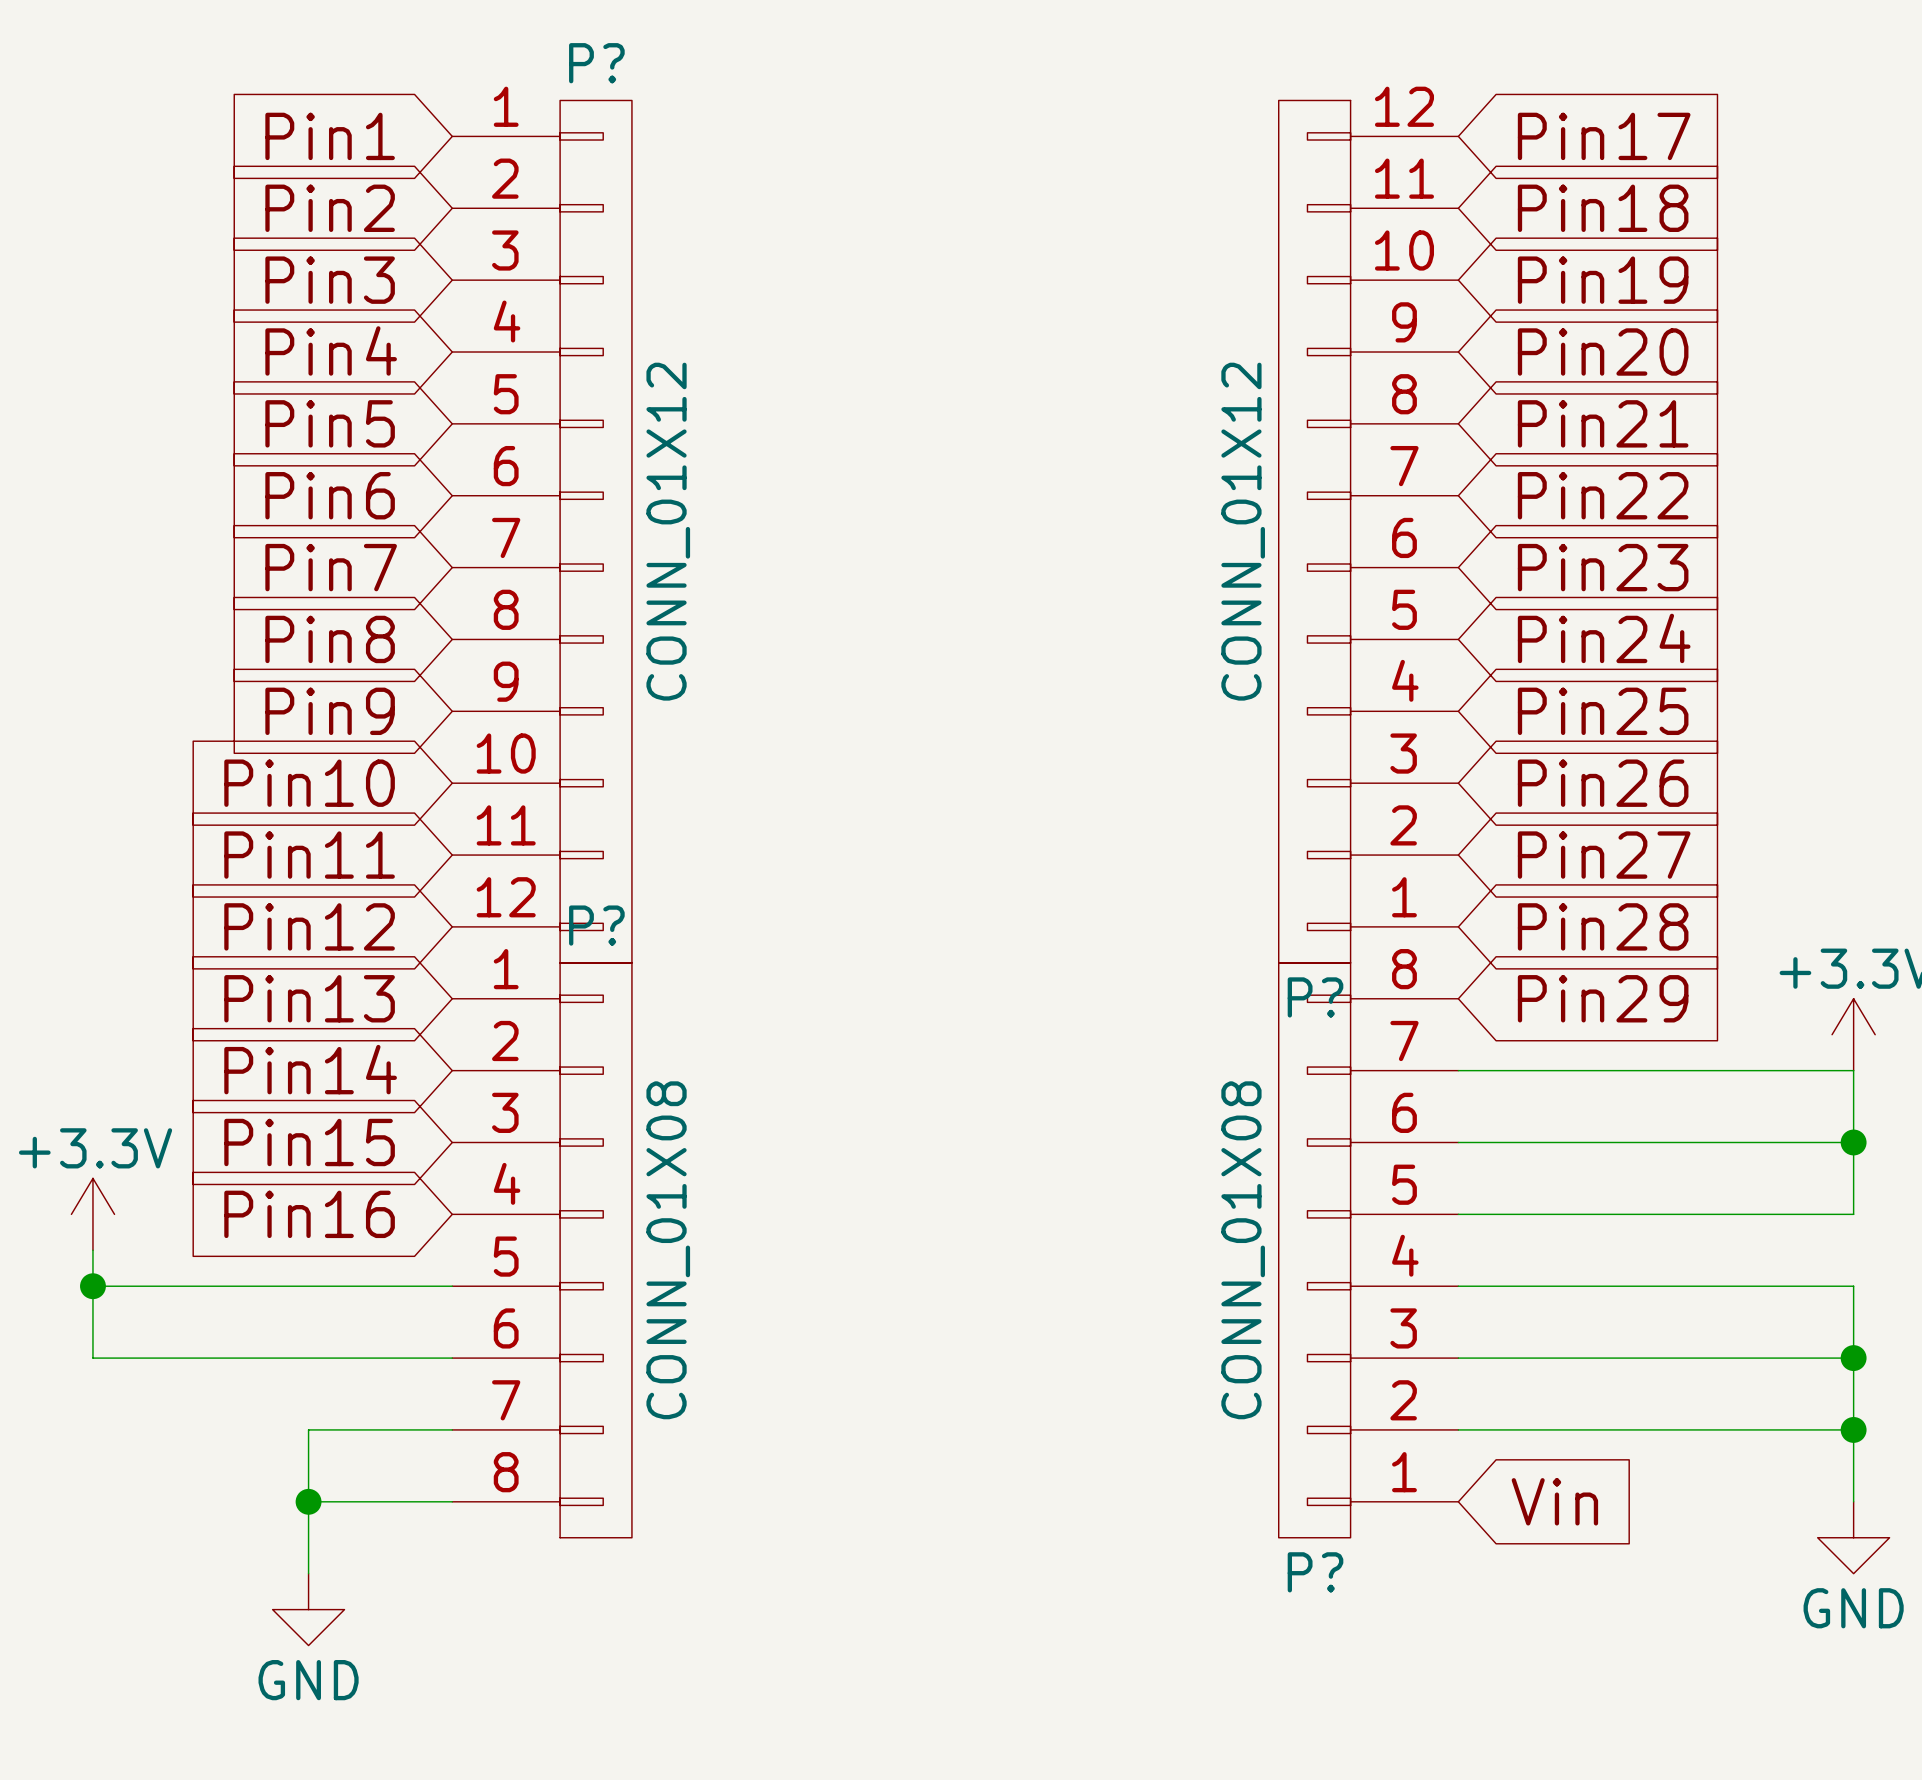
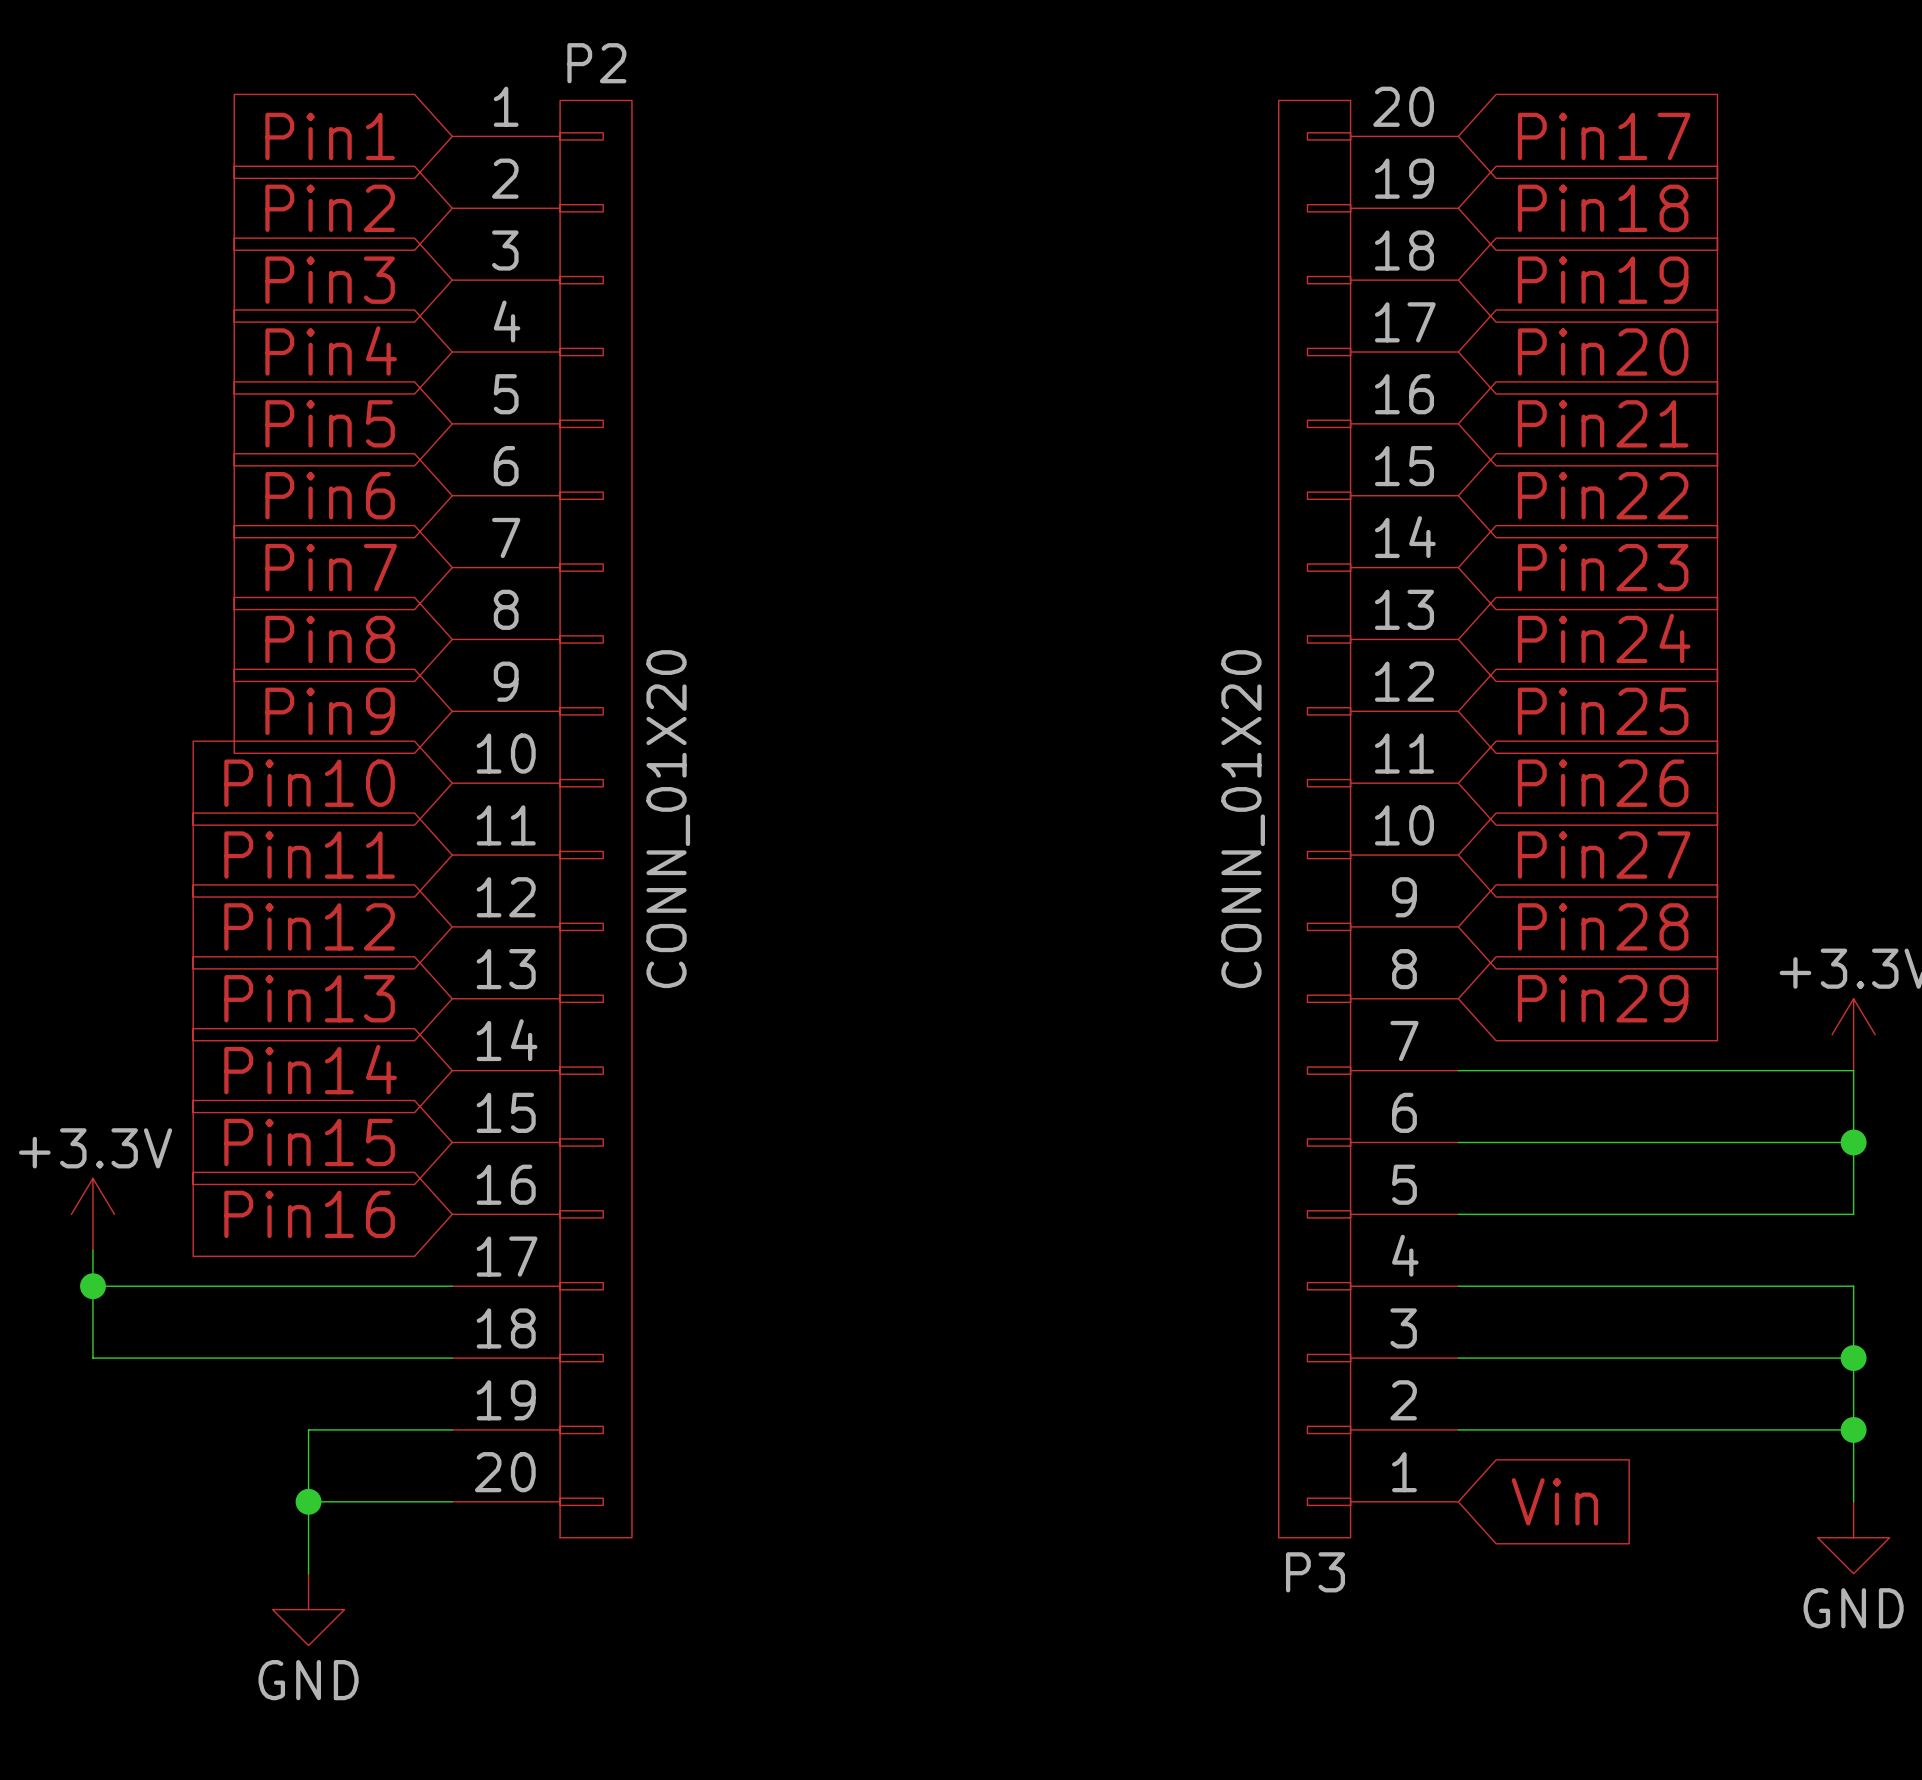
P?: CONN_01X12 (542, 531) -> none
P?: CONN_01X12 (1368, 531) -> none
P2: none -> CONN_01X20 (542, 819)
P3: none -> CONN_01X20 (1368, 819)
P?: CONN_01X08 (542, 1250) -> none
P?: CONN_01X08 (1368, 1250) -> none

